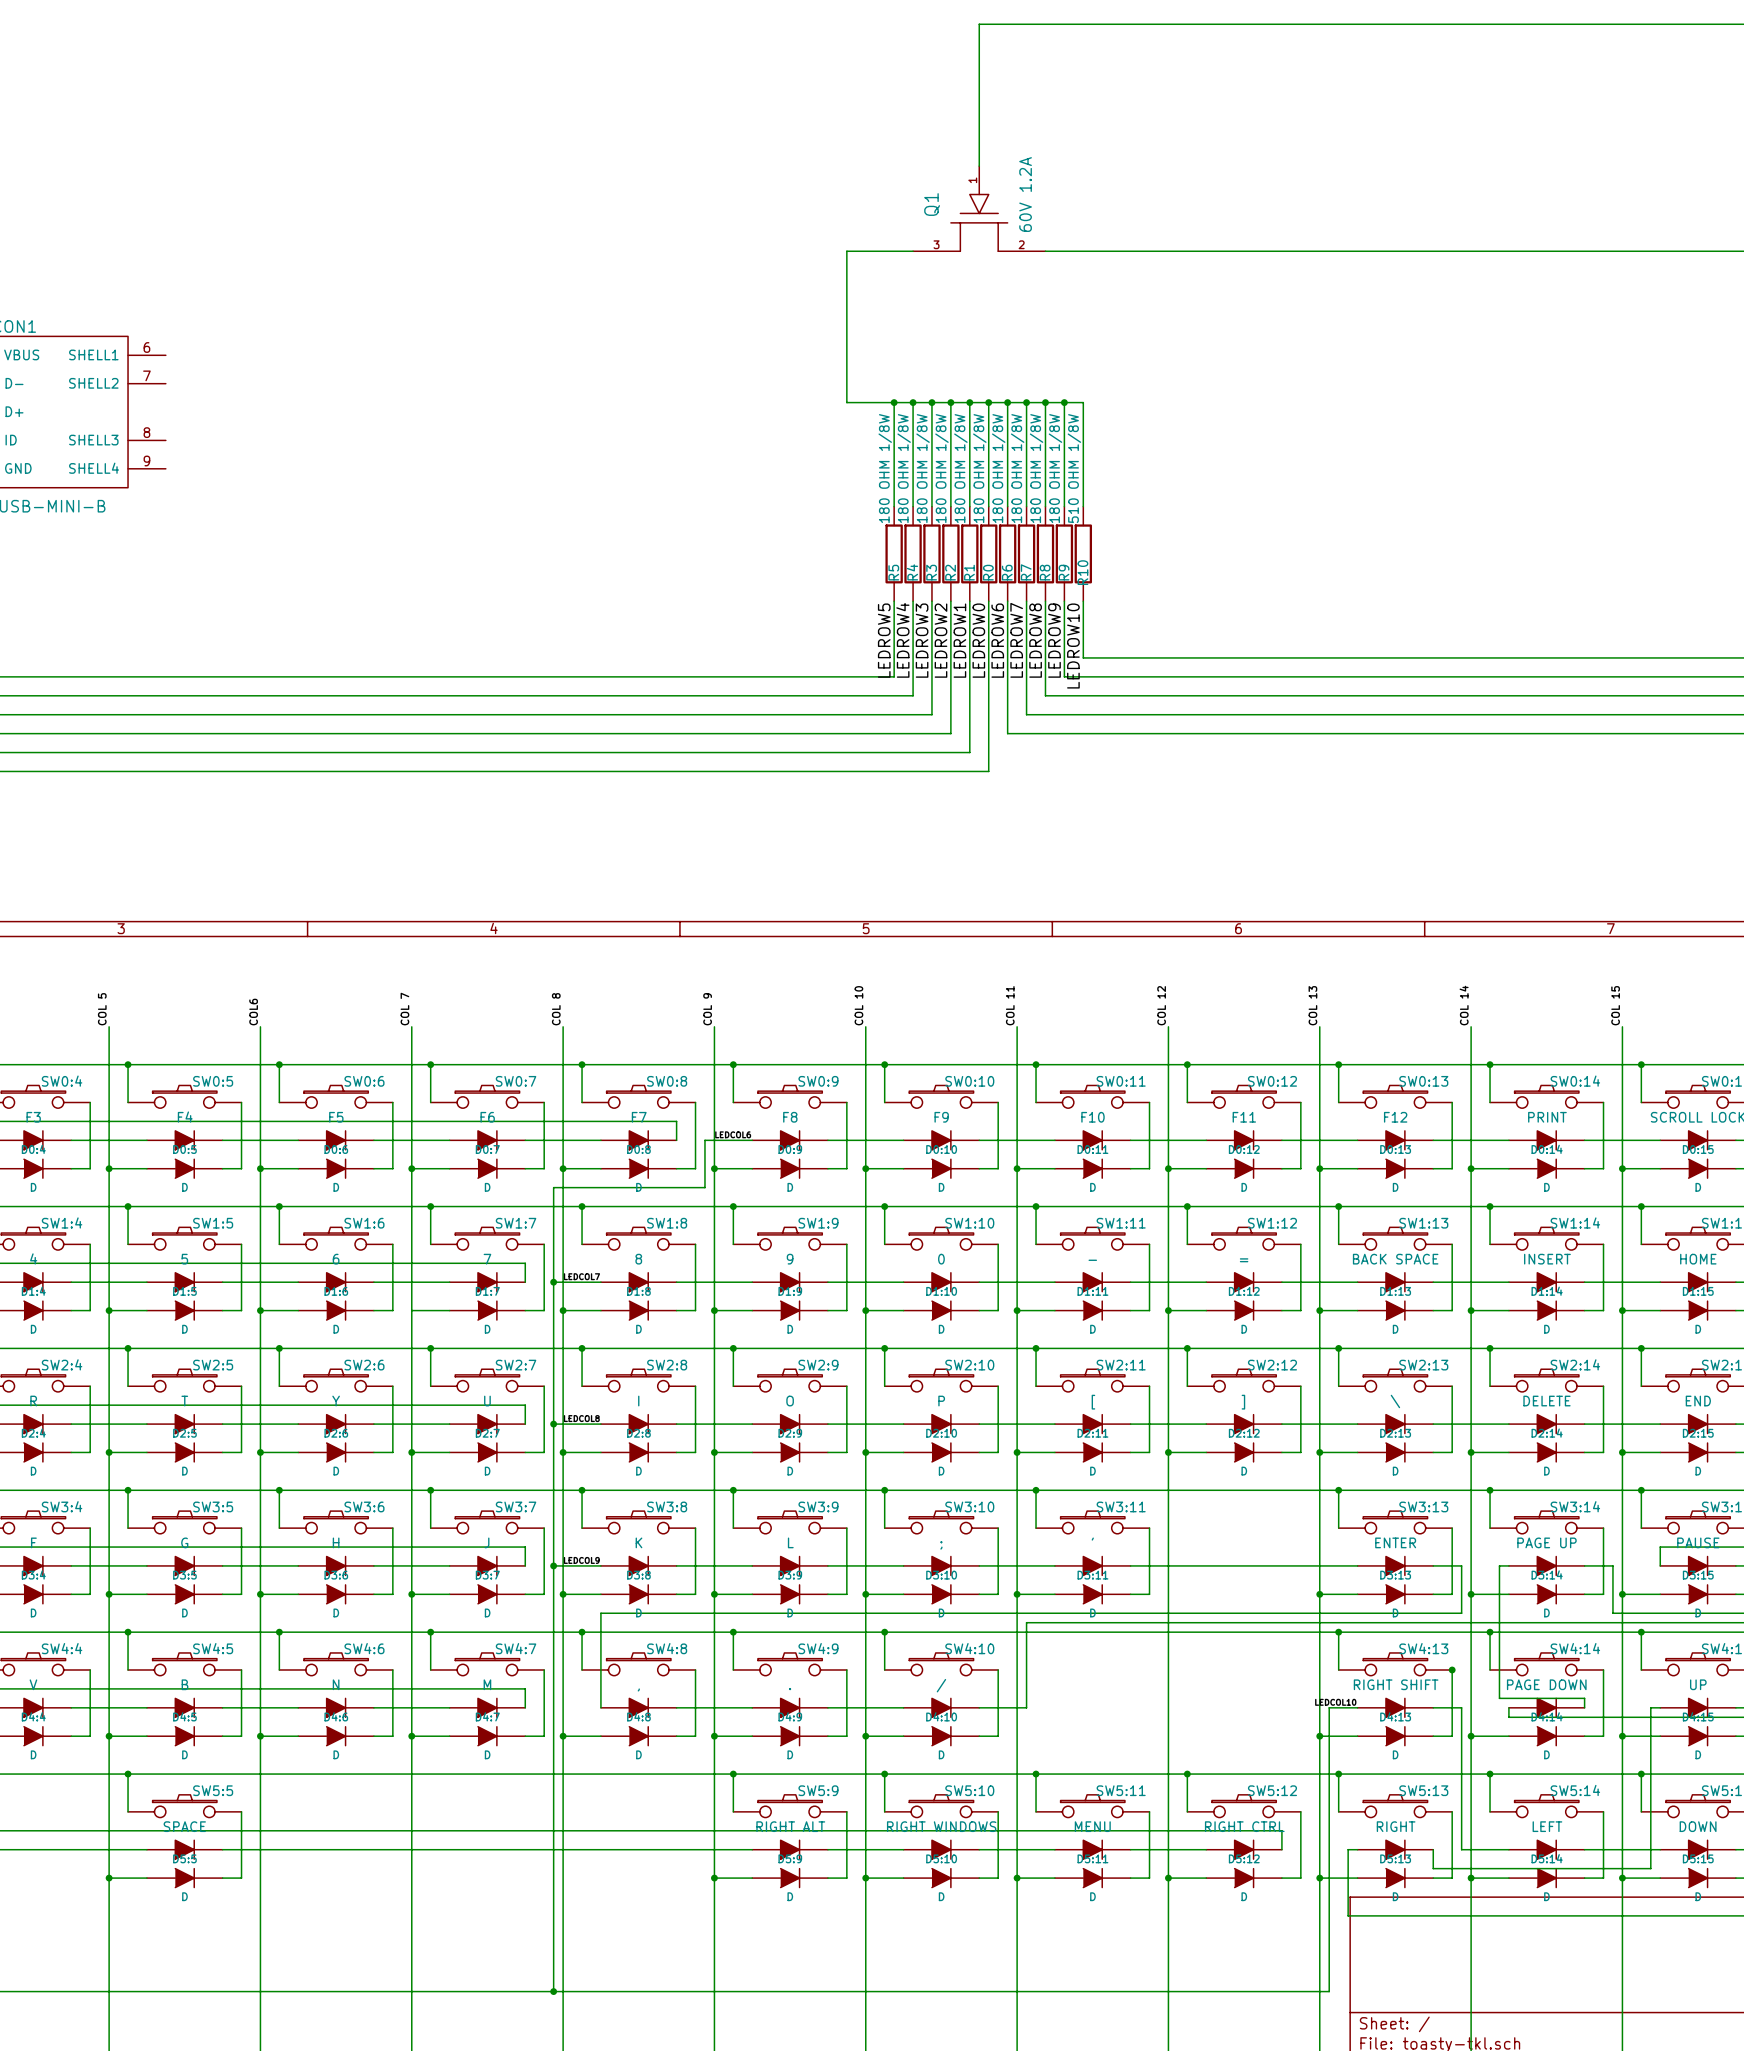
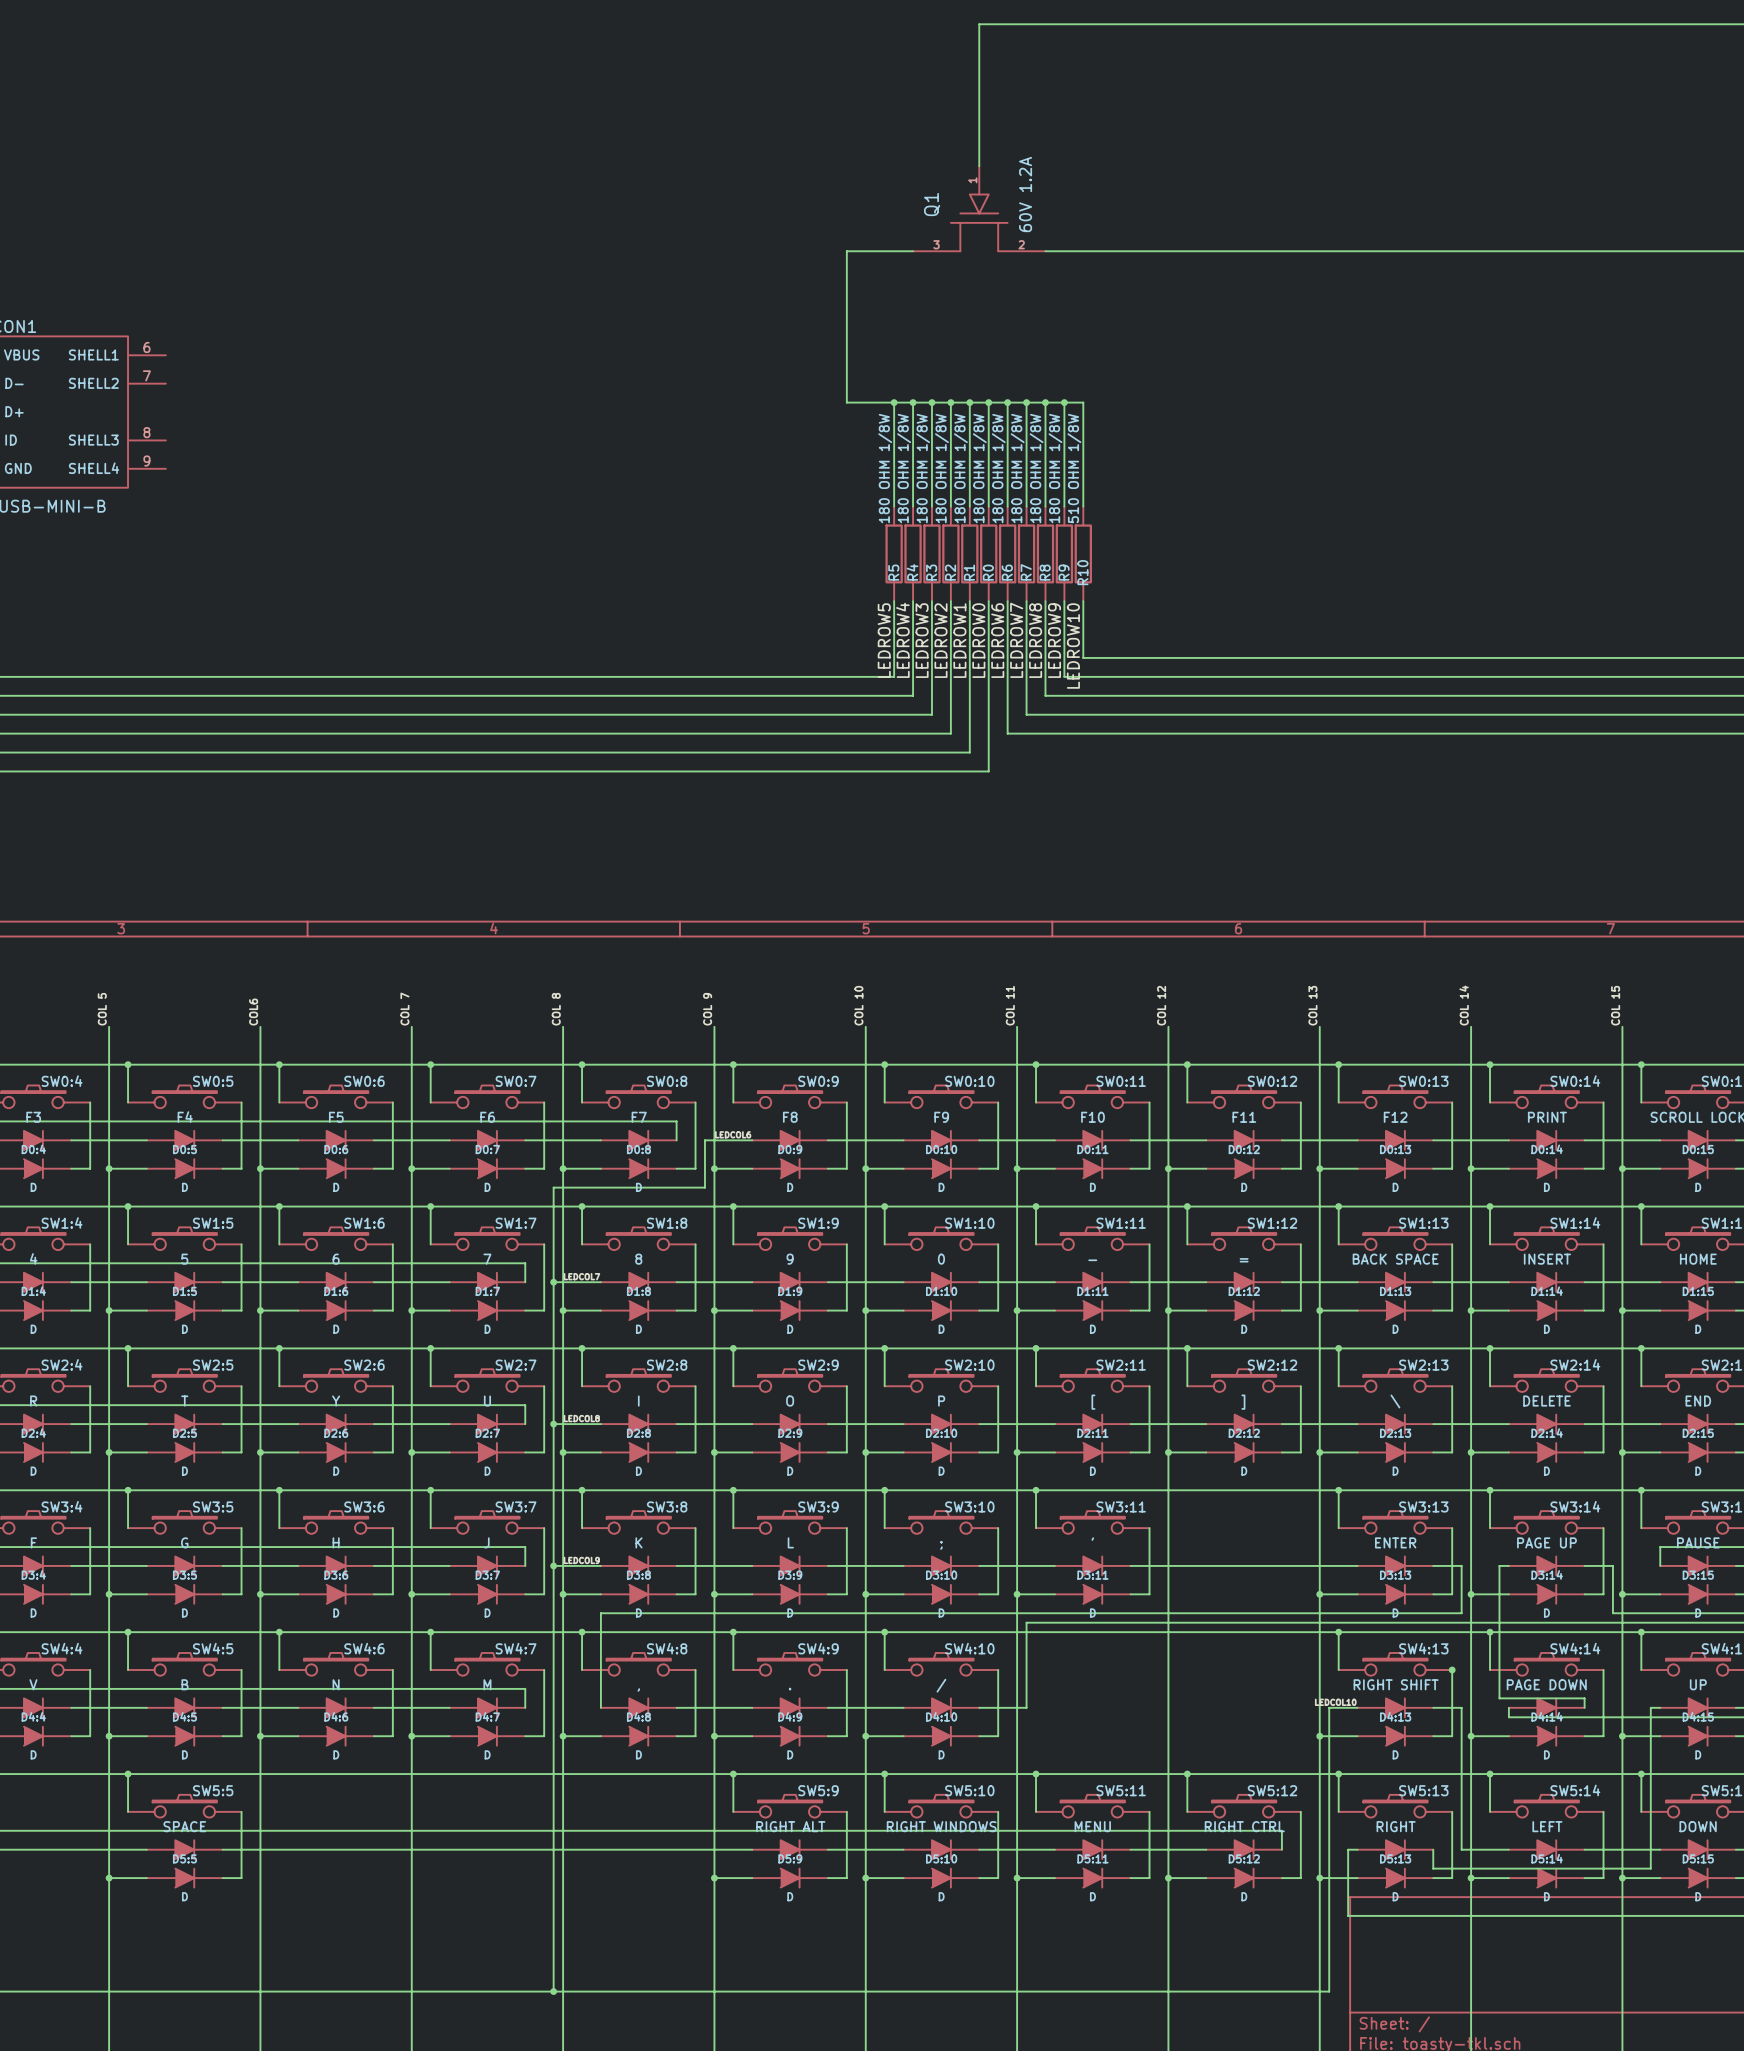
junction: none -> (411, 1310)

